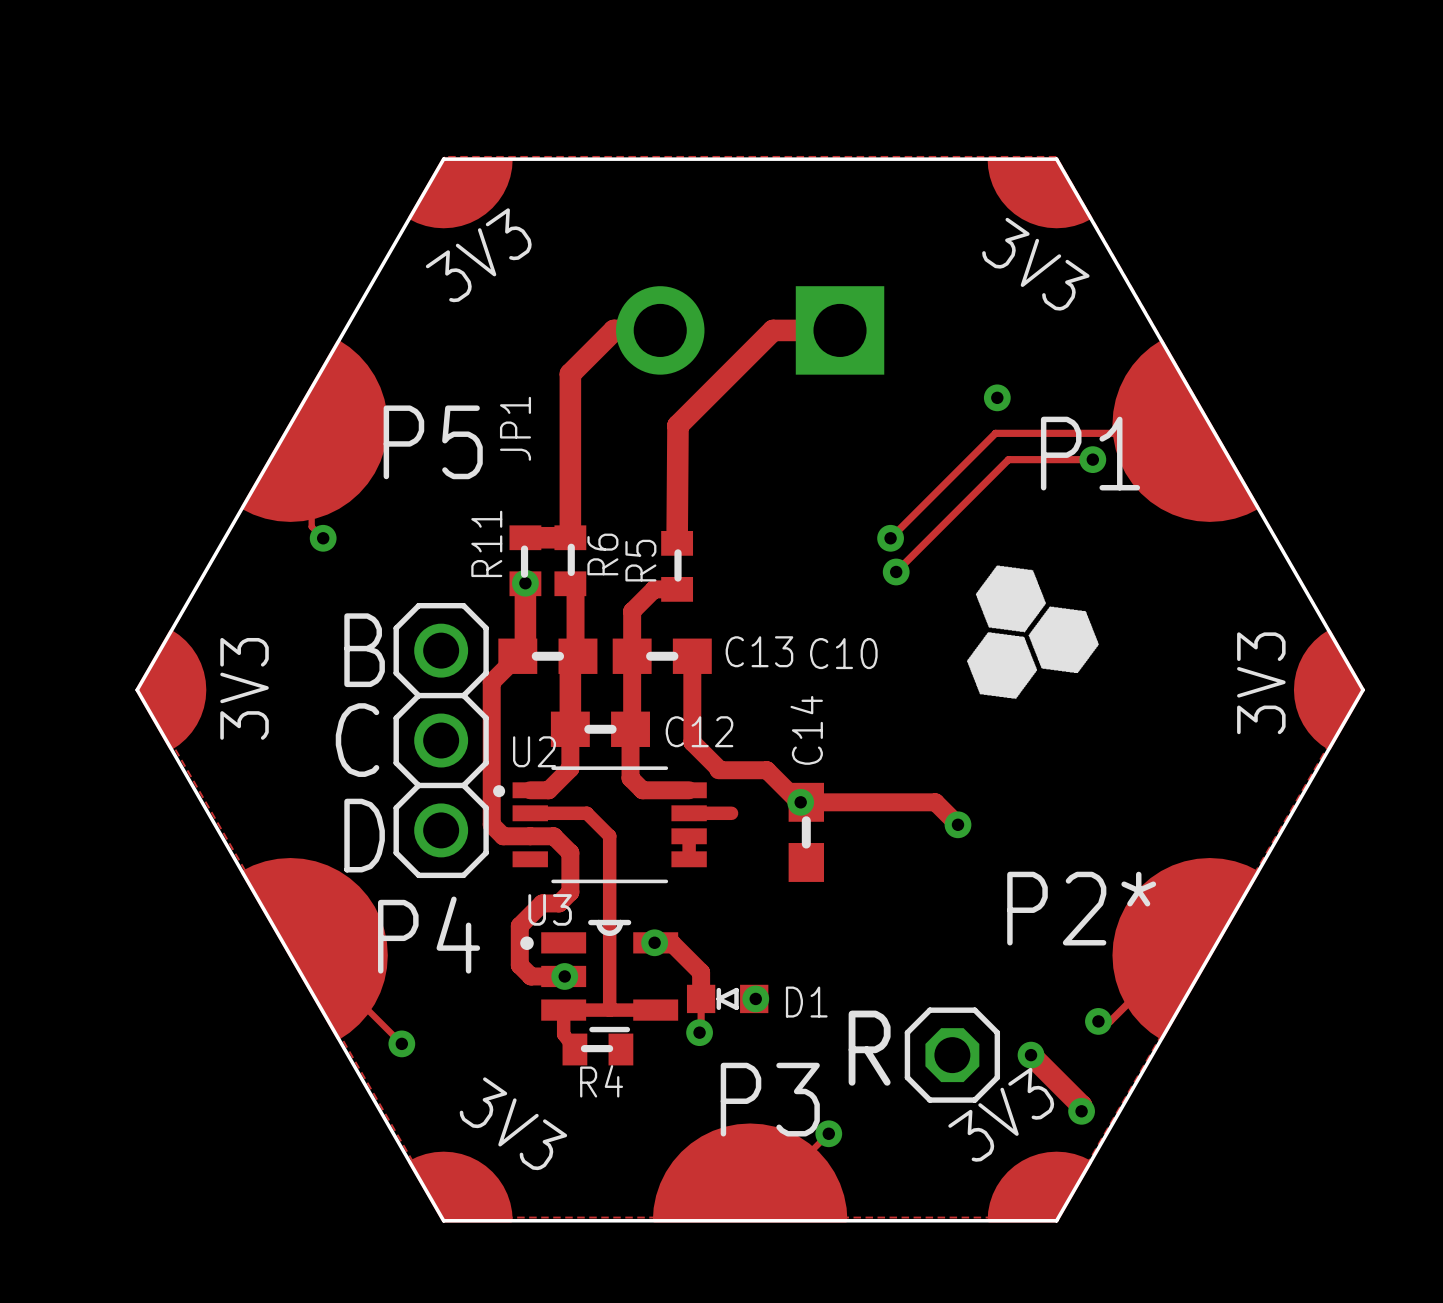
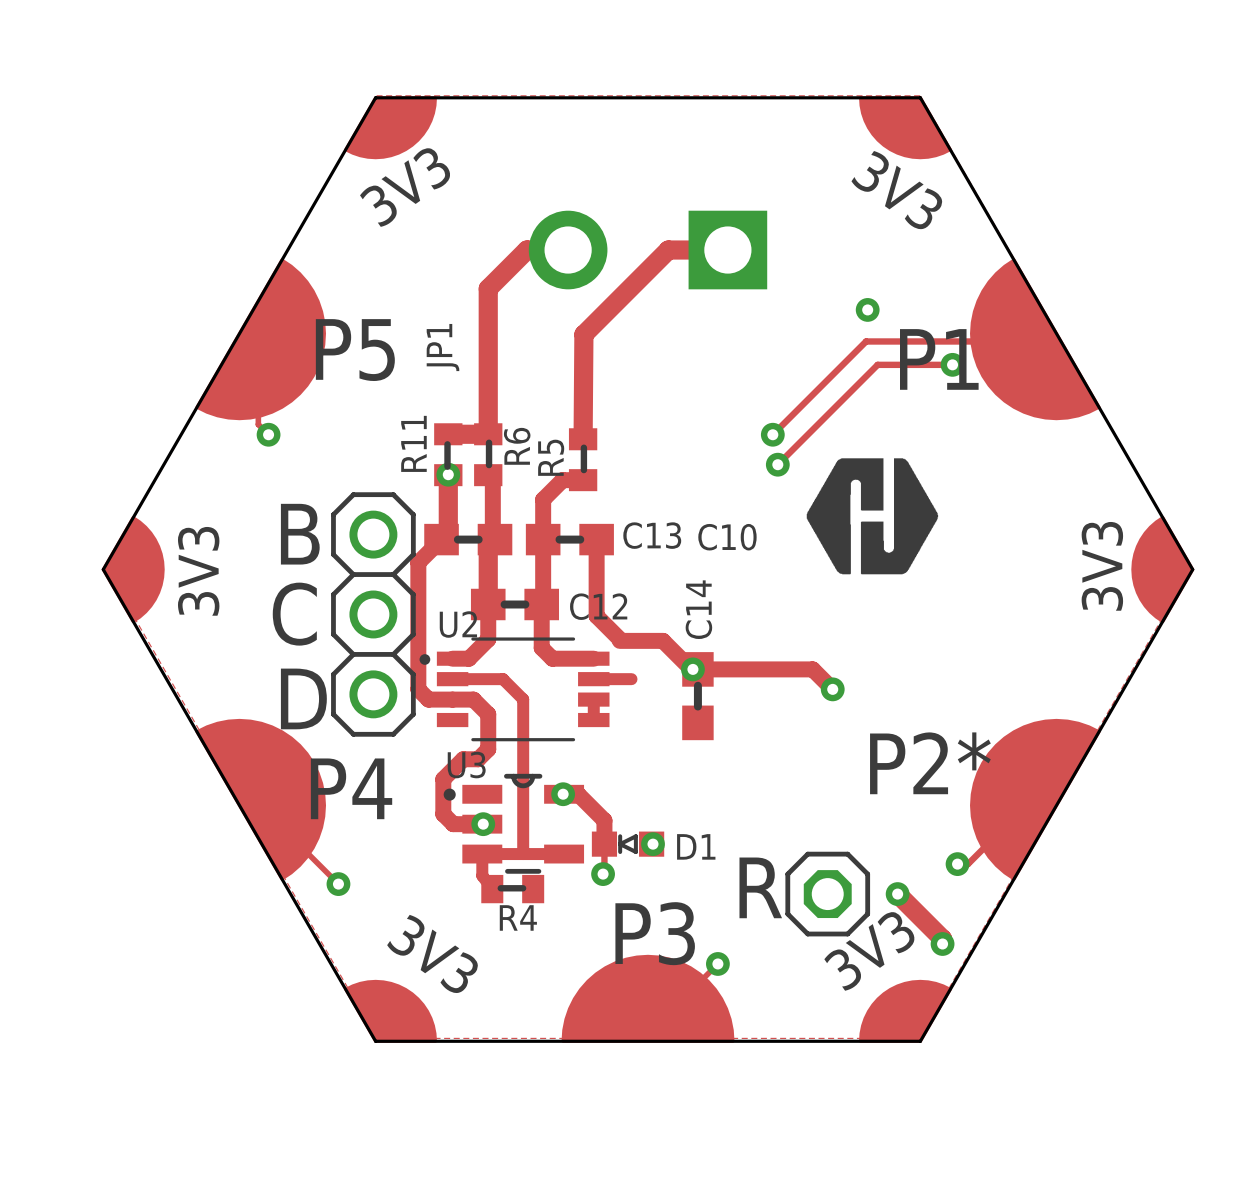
drawing: none -> [806, 458, 939, 575]
drawing: [967, 565, 1099, 700] -> none

